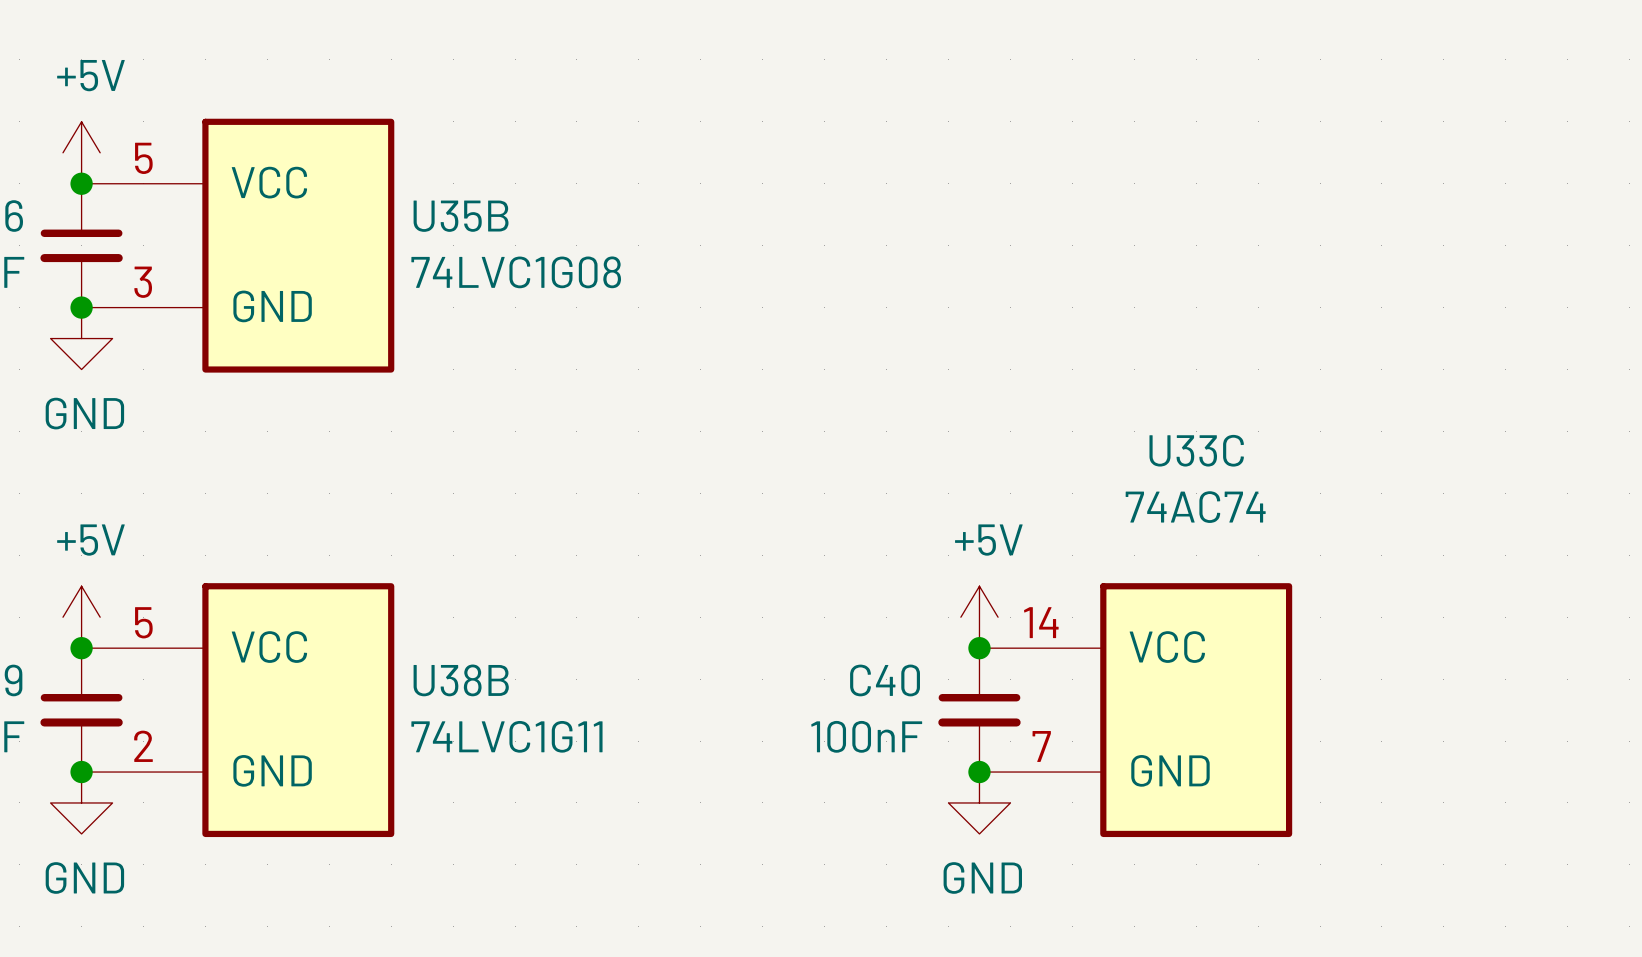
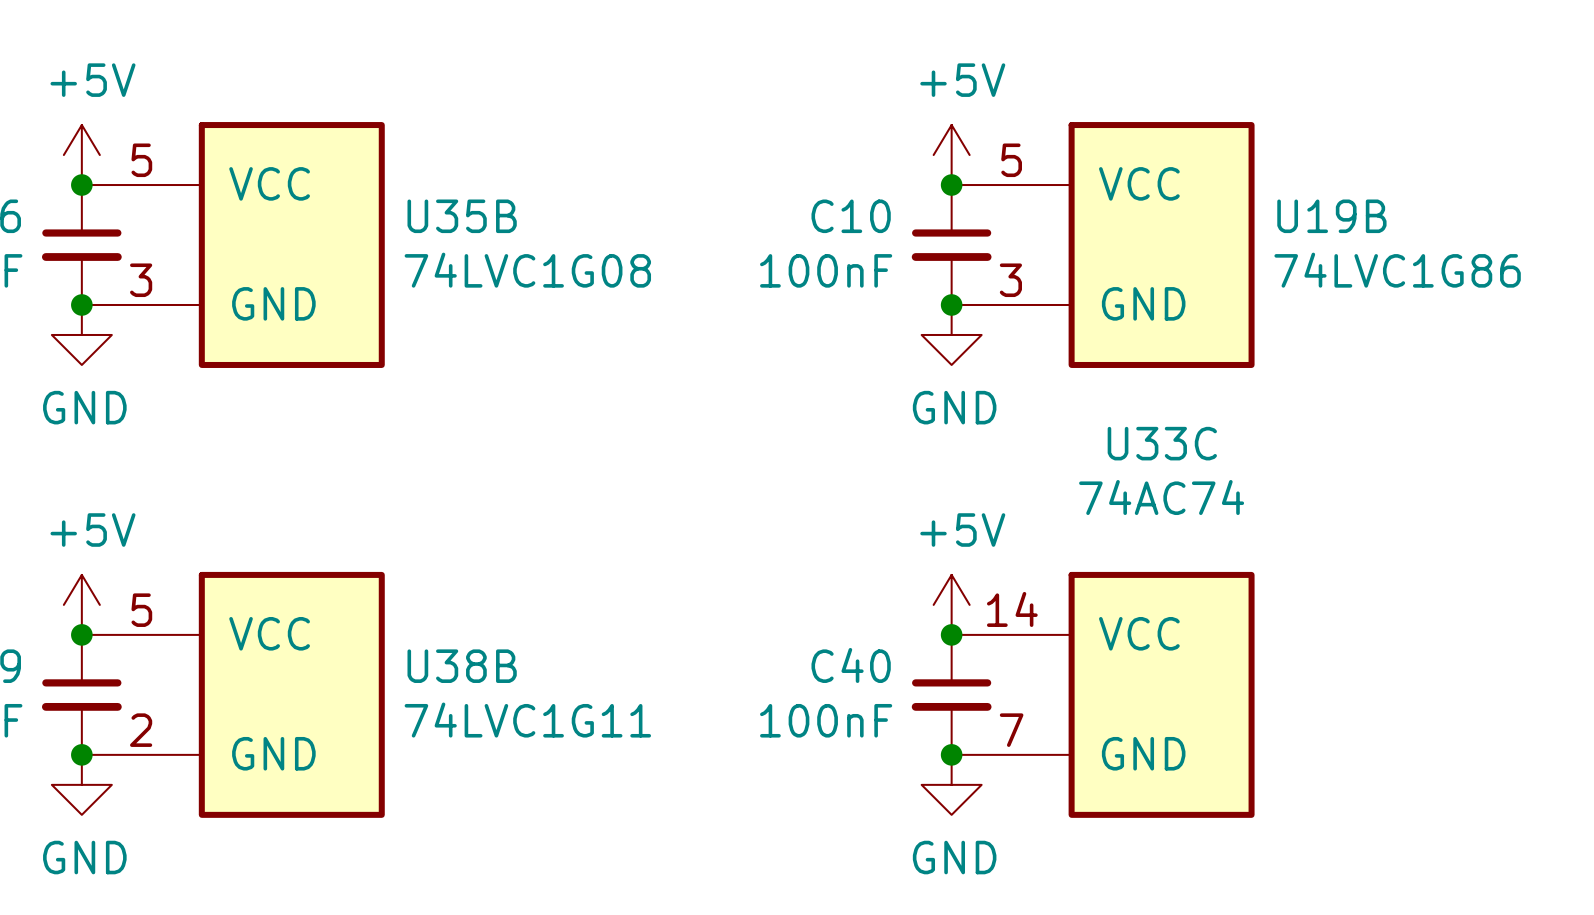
power symbol: none -> +5V (951, 155)
junction: none -> (951, 185)
C10: none -> 100nF (951, 245)
U19B: none -> 74LVC1G86 (1103, 245)
junction: none -> (951, 304)
power symbol: none -> GND (951, 334)

